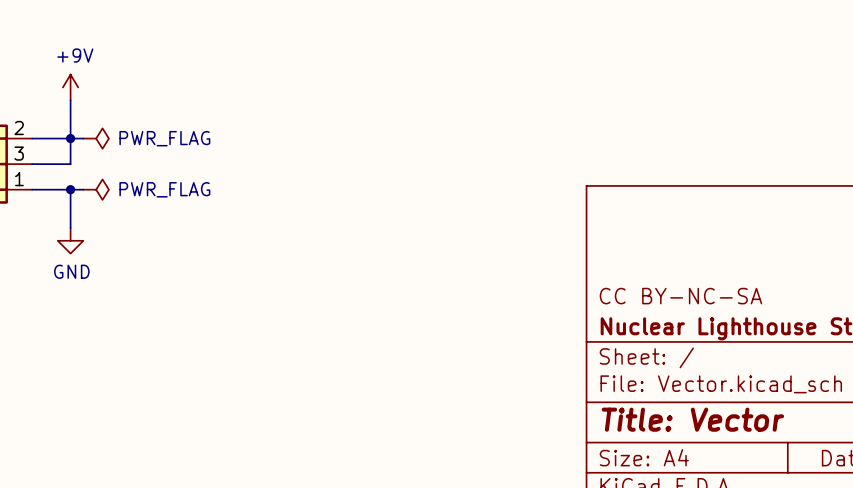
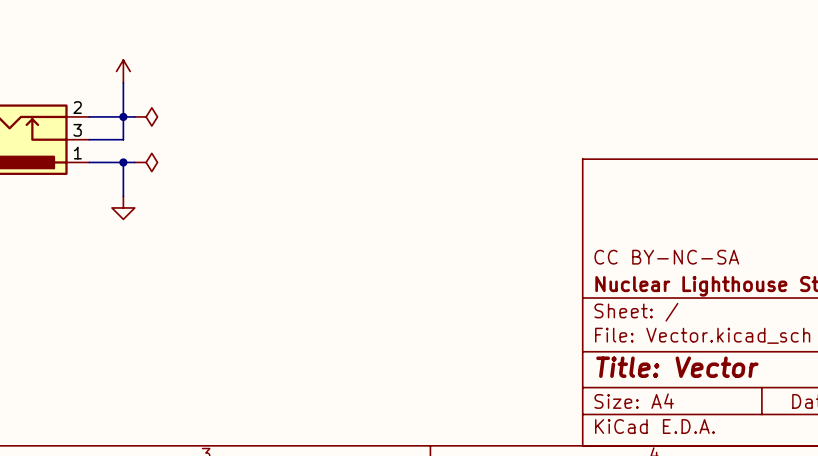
power symbol text: +9V (75, 55) -> none
power symbol text: PWR_FLAG (164, 138) -> none
power symbol text: PWR_FLAG (164, 189) -> none
power symbol text: GND (71, 271) -> none

